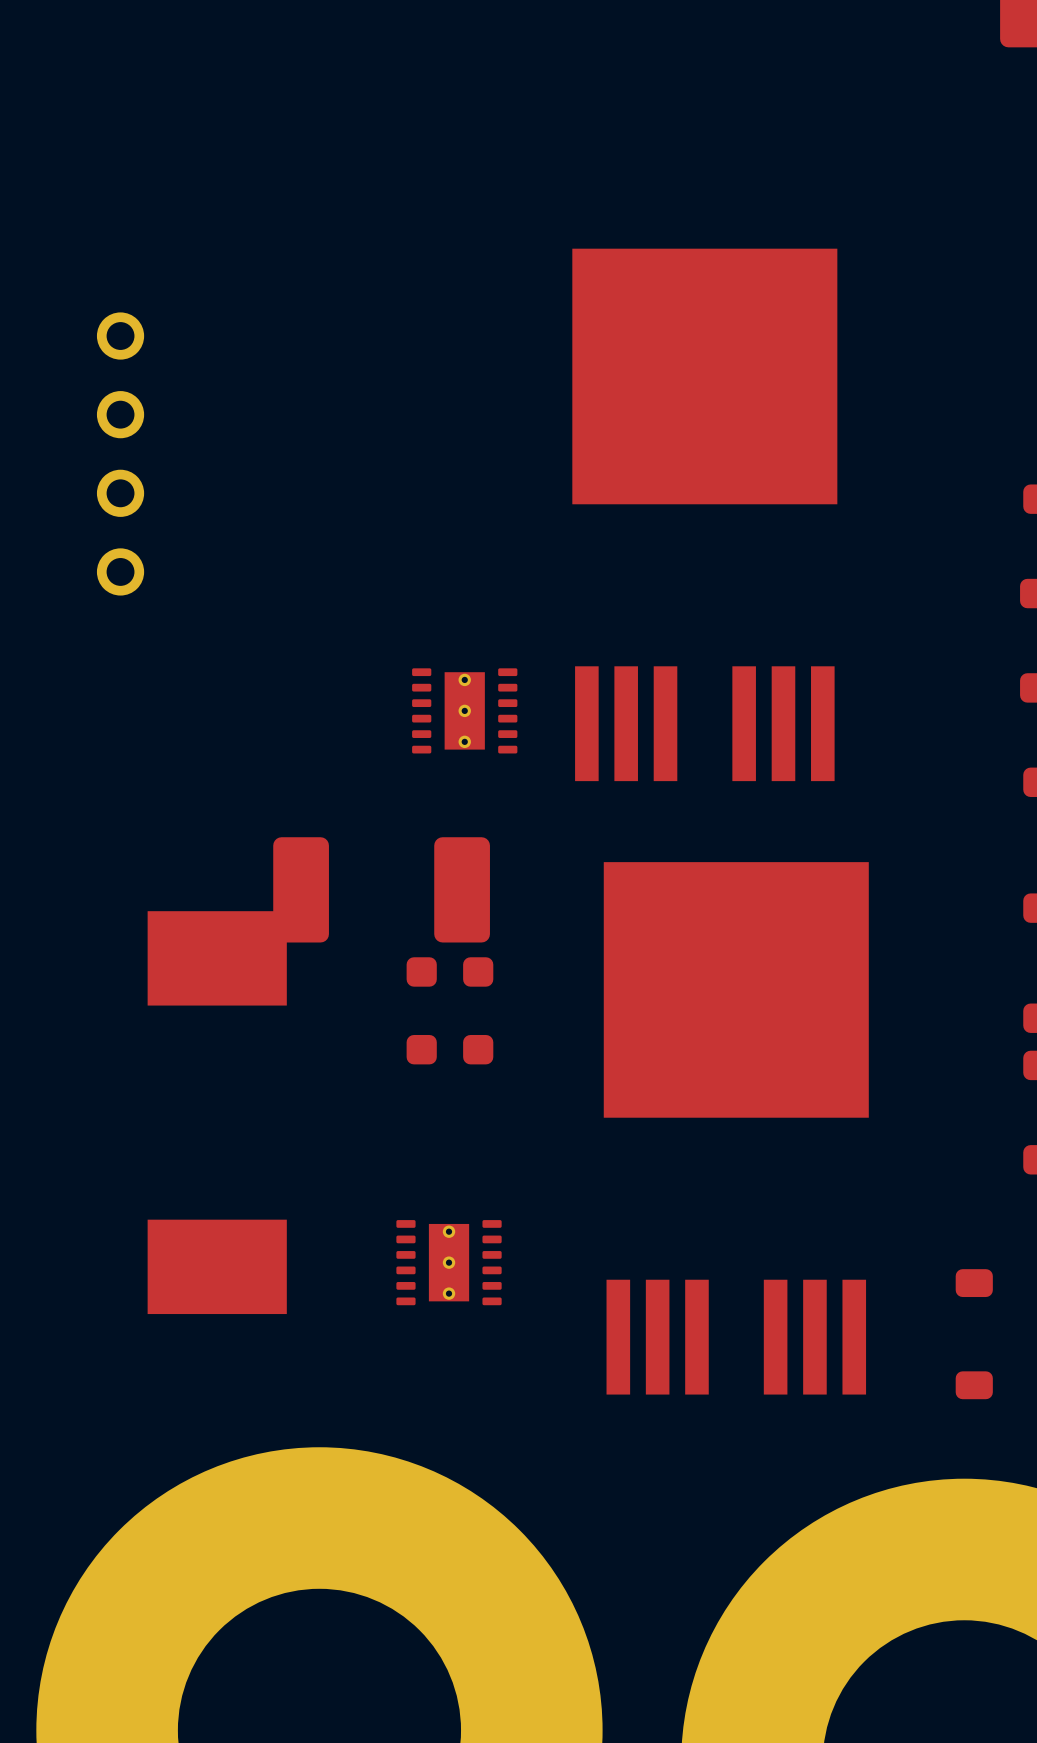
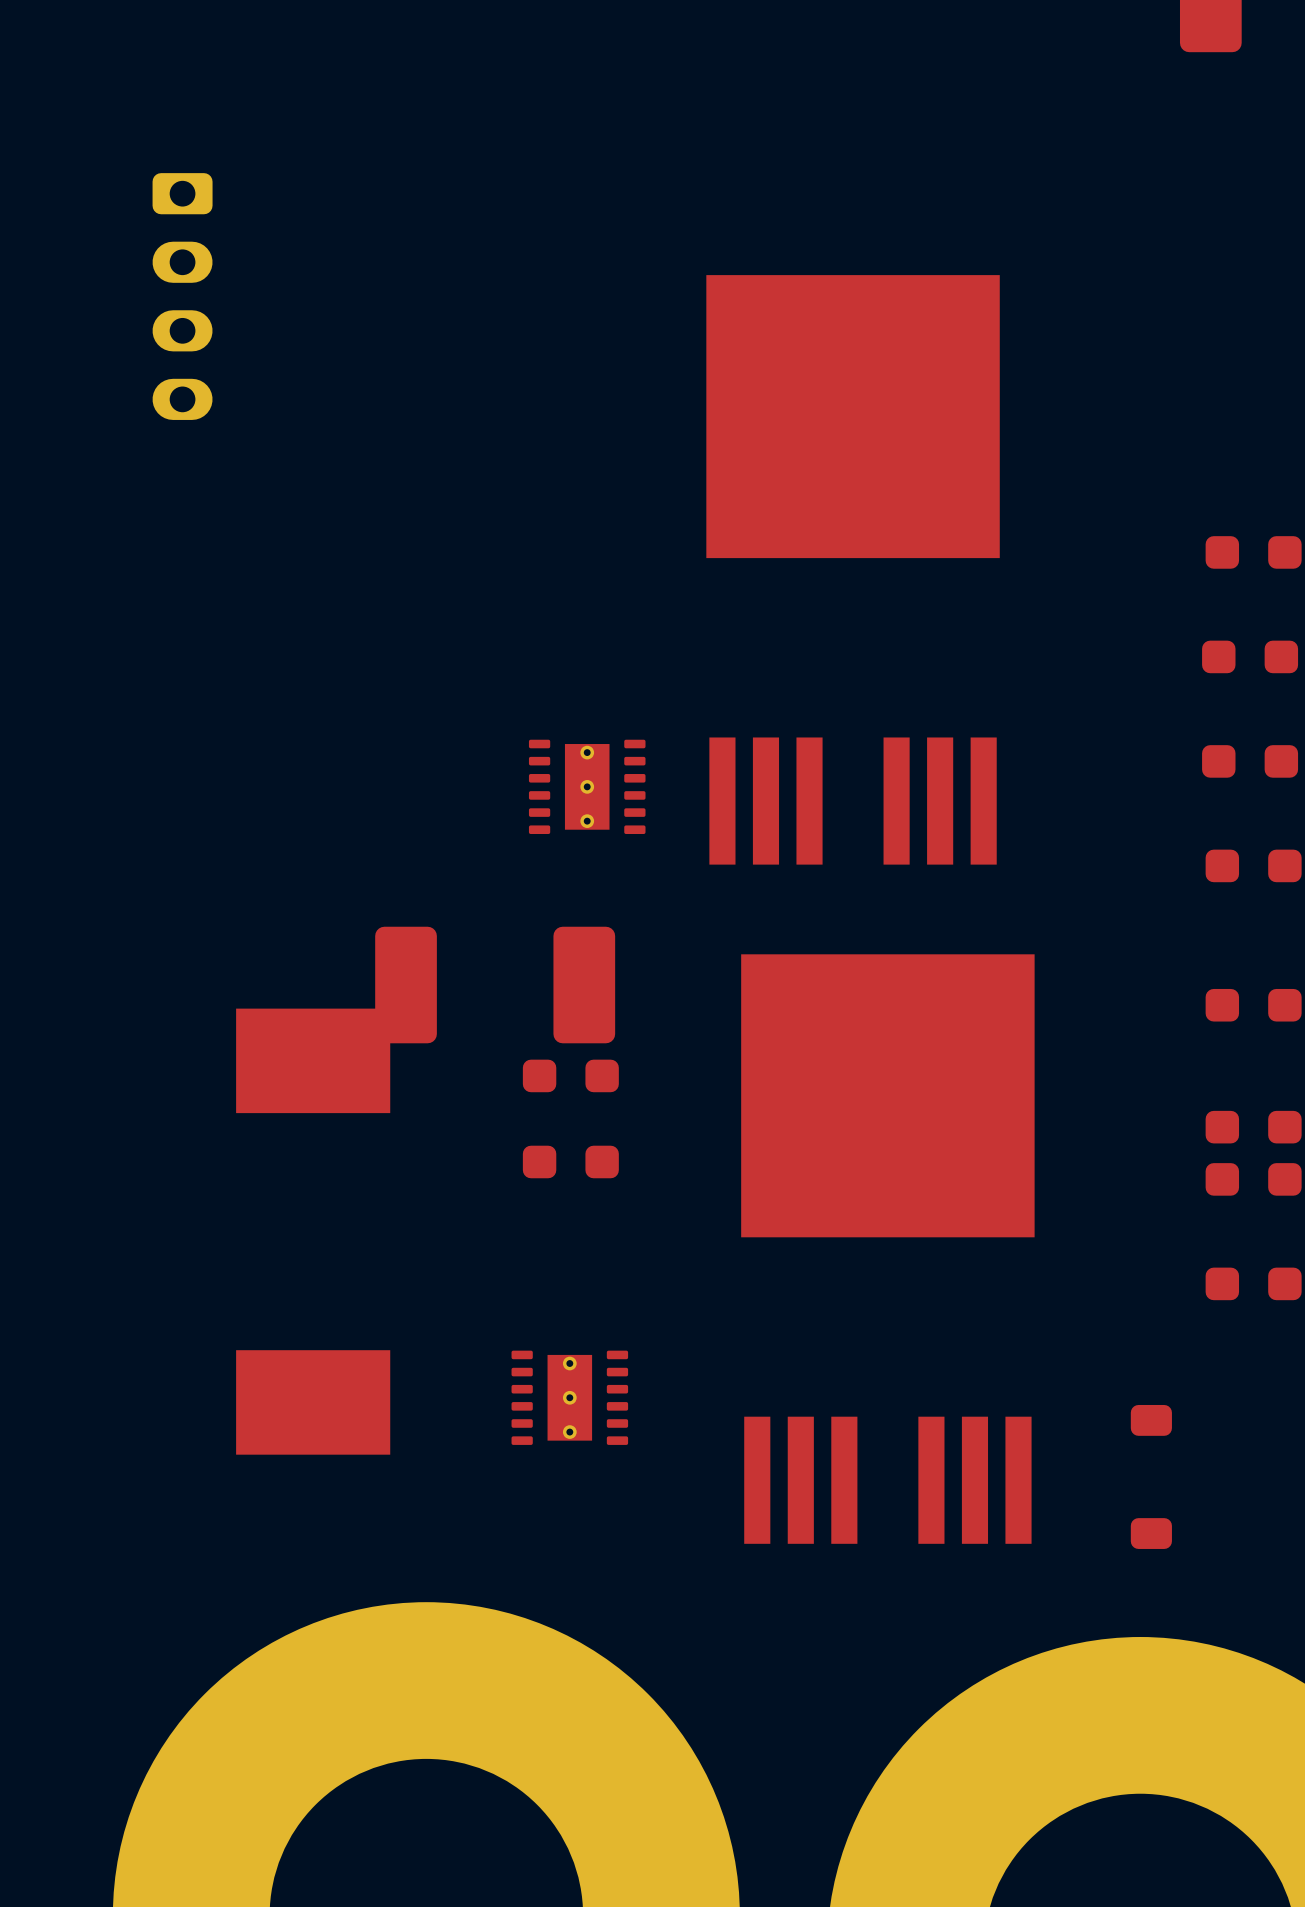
part: none -> (182, 296)
part: (120, 453) -> none

